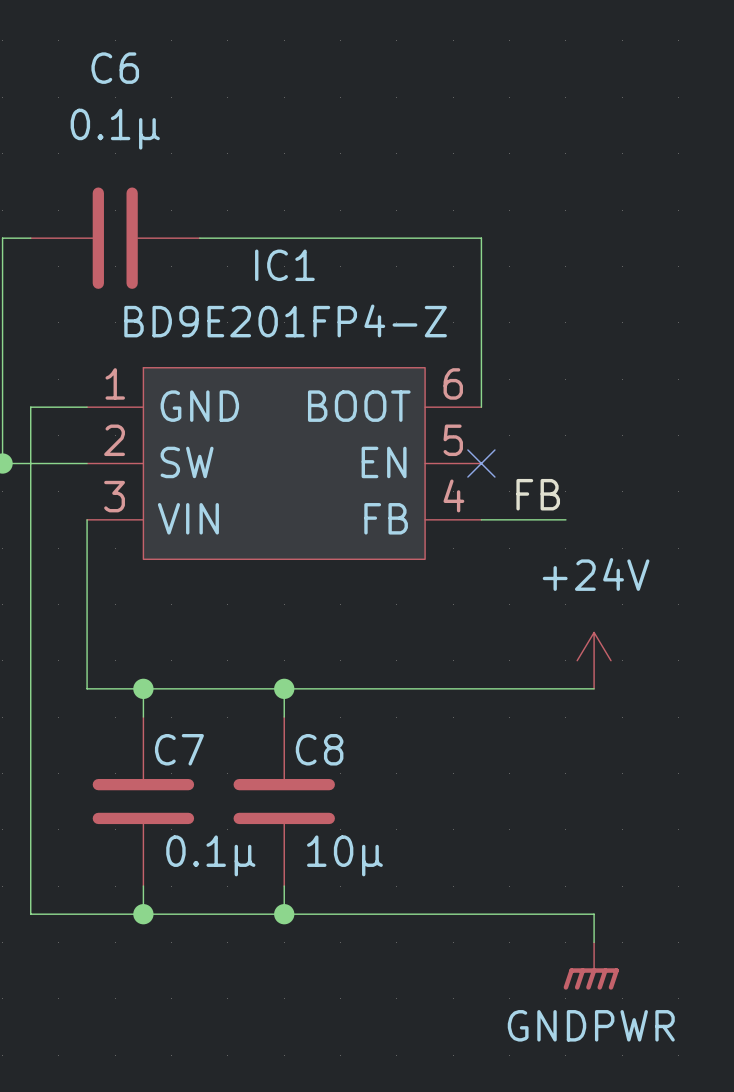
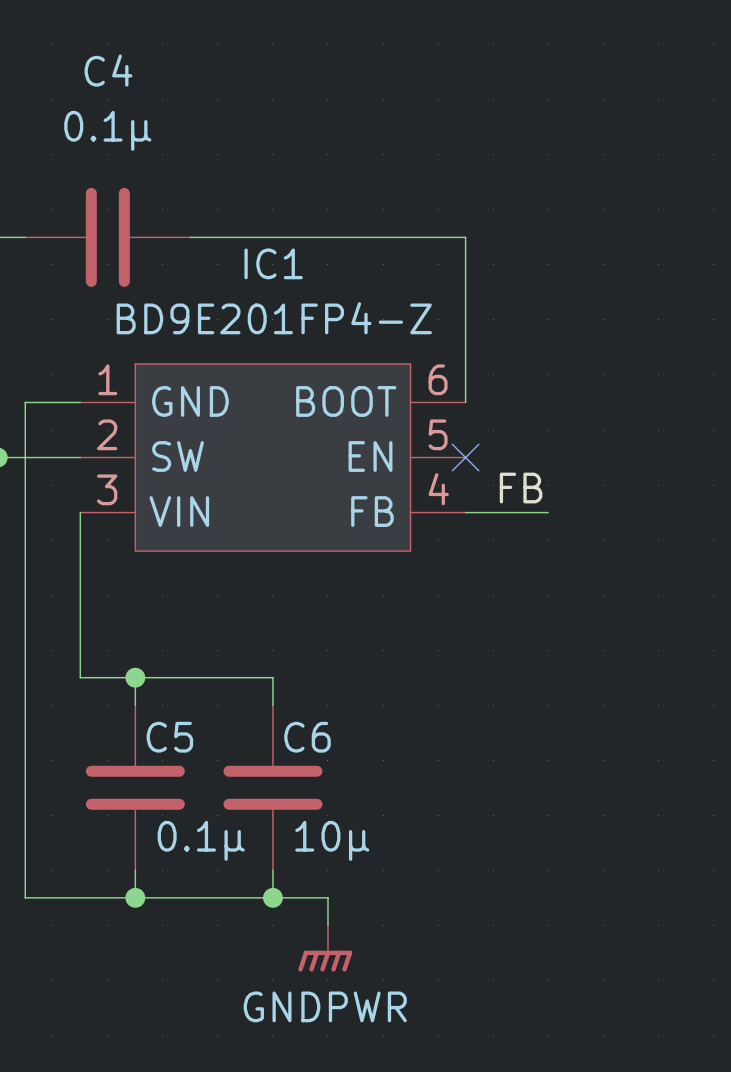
C6 name: C6 (115, 68) -> C4 (108, 70)
power symbol: +24V (594, 660) -> none
wire: (284, 688) (594, 688) -> none
junction: (284, 688) -> none
C7 name: C7 (179, 749) -> C5 (169, 737)
C8 name: C8 (319, 749) -> C6 (307, 737)
wire: (340, 914) (594, 914) (594, 942) -> (327, 897) (327, 925)
power symbol position: GNDPWR (591, 966) -> GNDPWR (325, 948)

